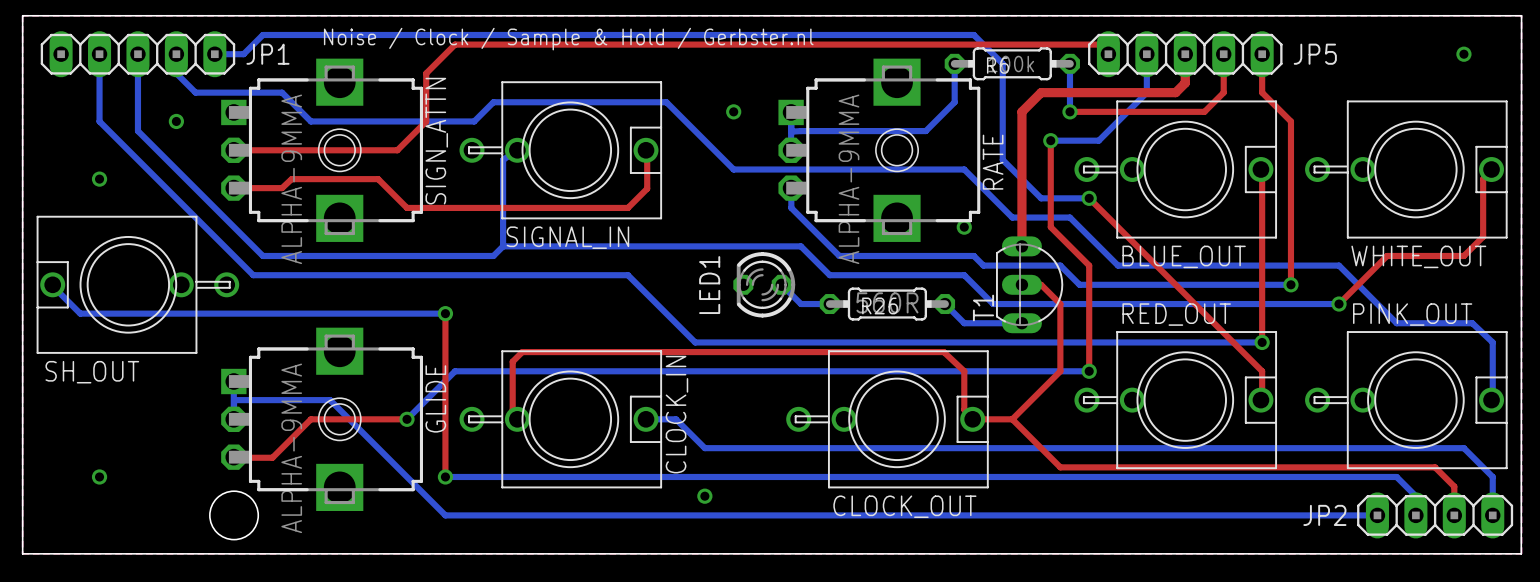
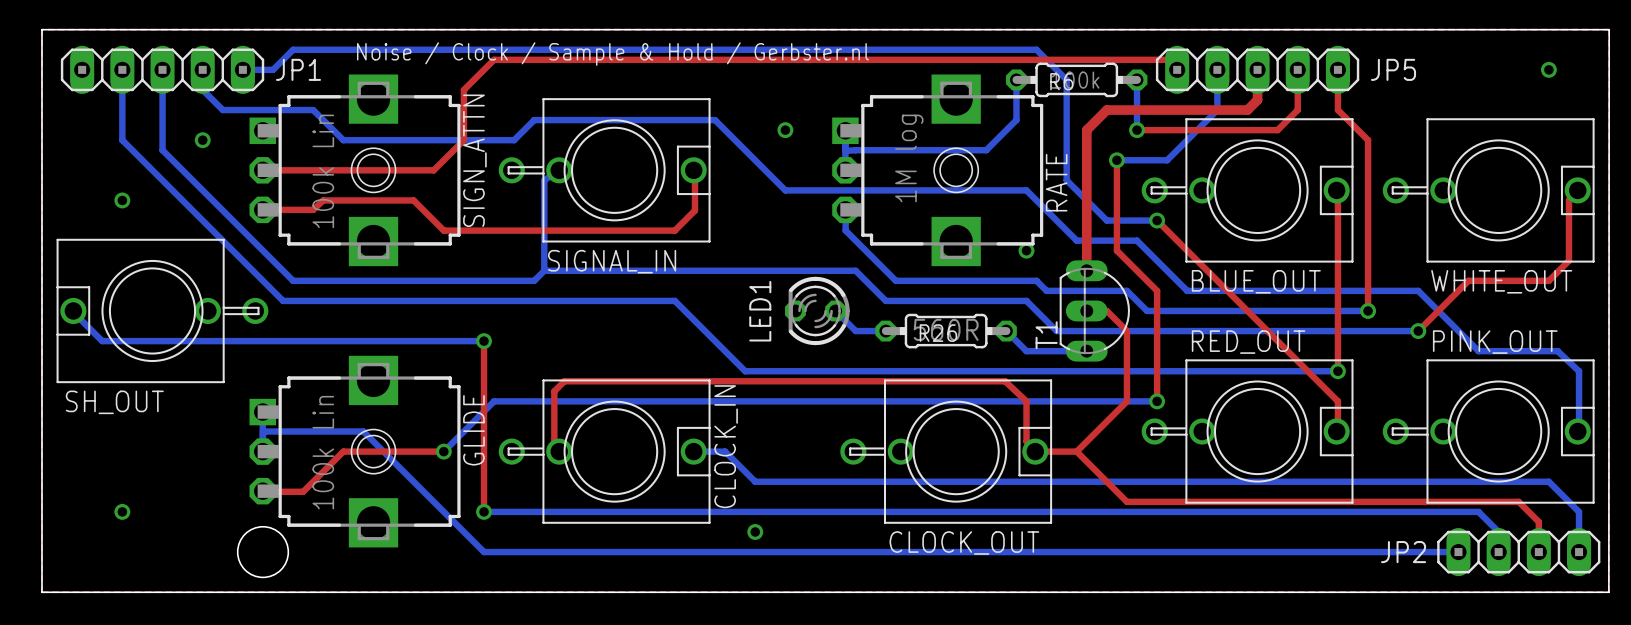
SIGN_ATTN value: ALPHA-9MMA (291, 179) -> 100k Lin (323, 171)
RATE value: ALPHA-9MMA (848, 179) -> 1M log (909, 158)
GLIDE value: ALPHA-9MMA (291, 448) -> 100k Lin (323, 452)

